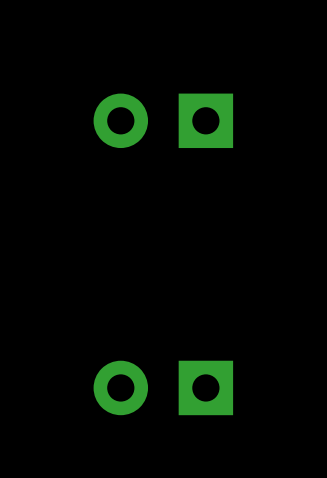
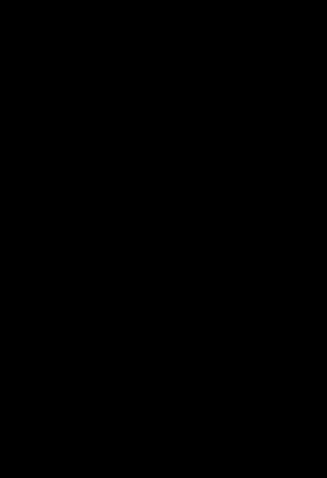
part: (163, 120) -> none
part: (163, 387) -> none

